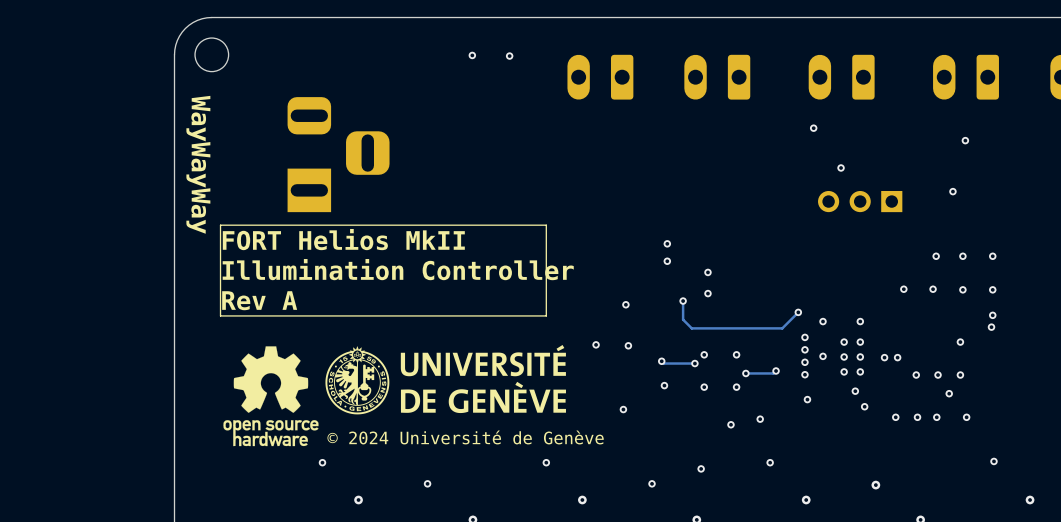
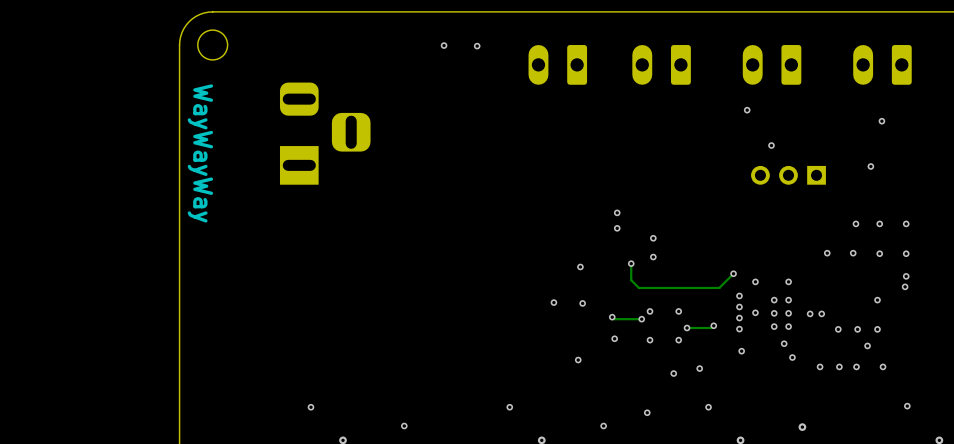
line: (546, 225) (220, 225) (220, 315) (546, 315) (546, 225) -> none
text: FORT Helios MkII (343, 239) -> none
text: Illumination Controller (398, 269) -> none
text: Rev A (259, 300) -> none
drawing: [223, 344, 566, 447] -> none
text: © 2024 Université de Genève (465, 437) -> none

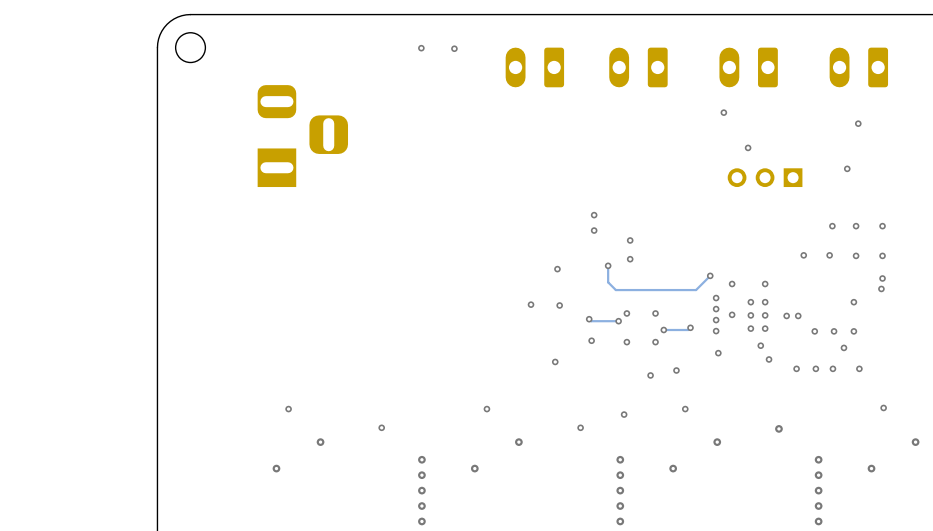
text: WayWayWay (200, 153) -> none

